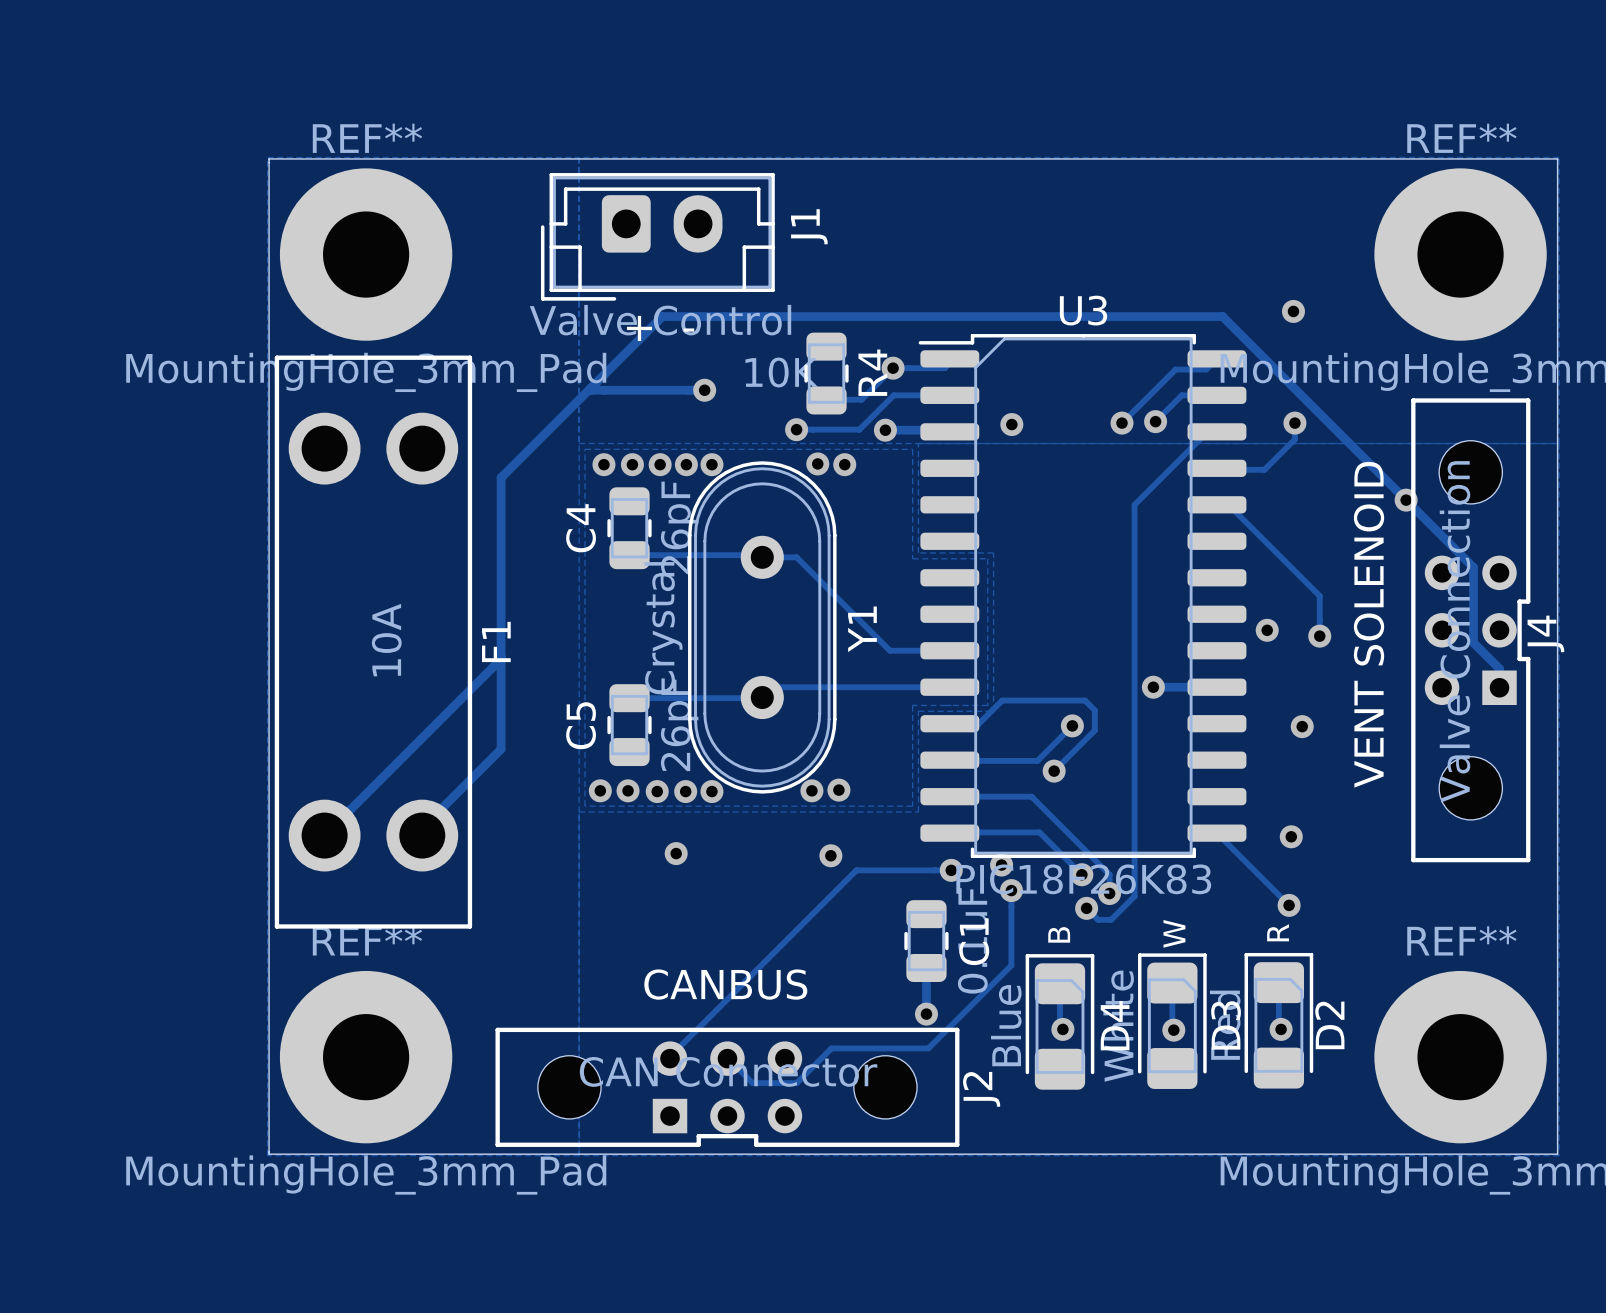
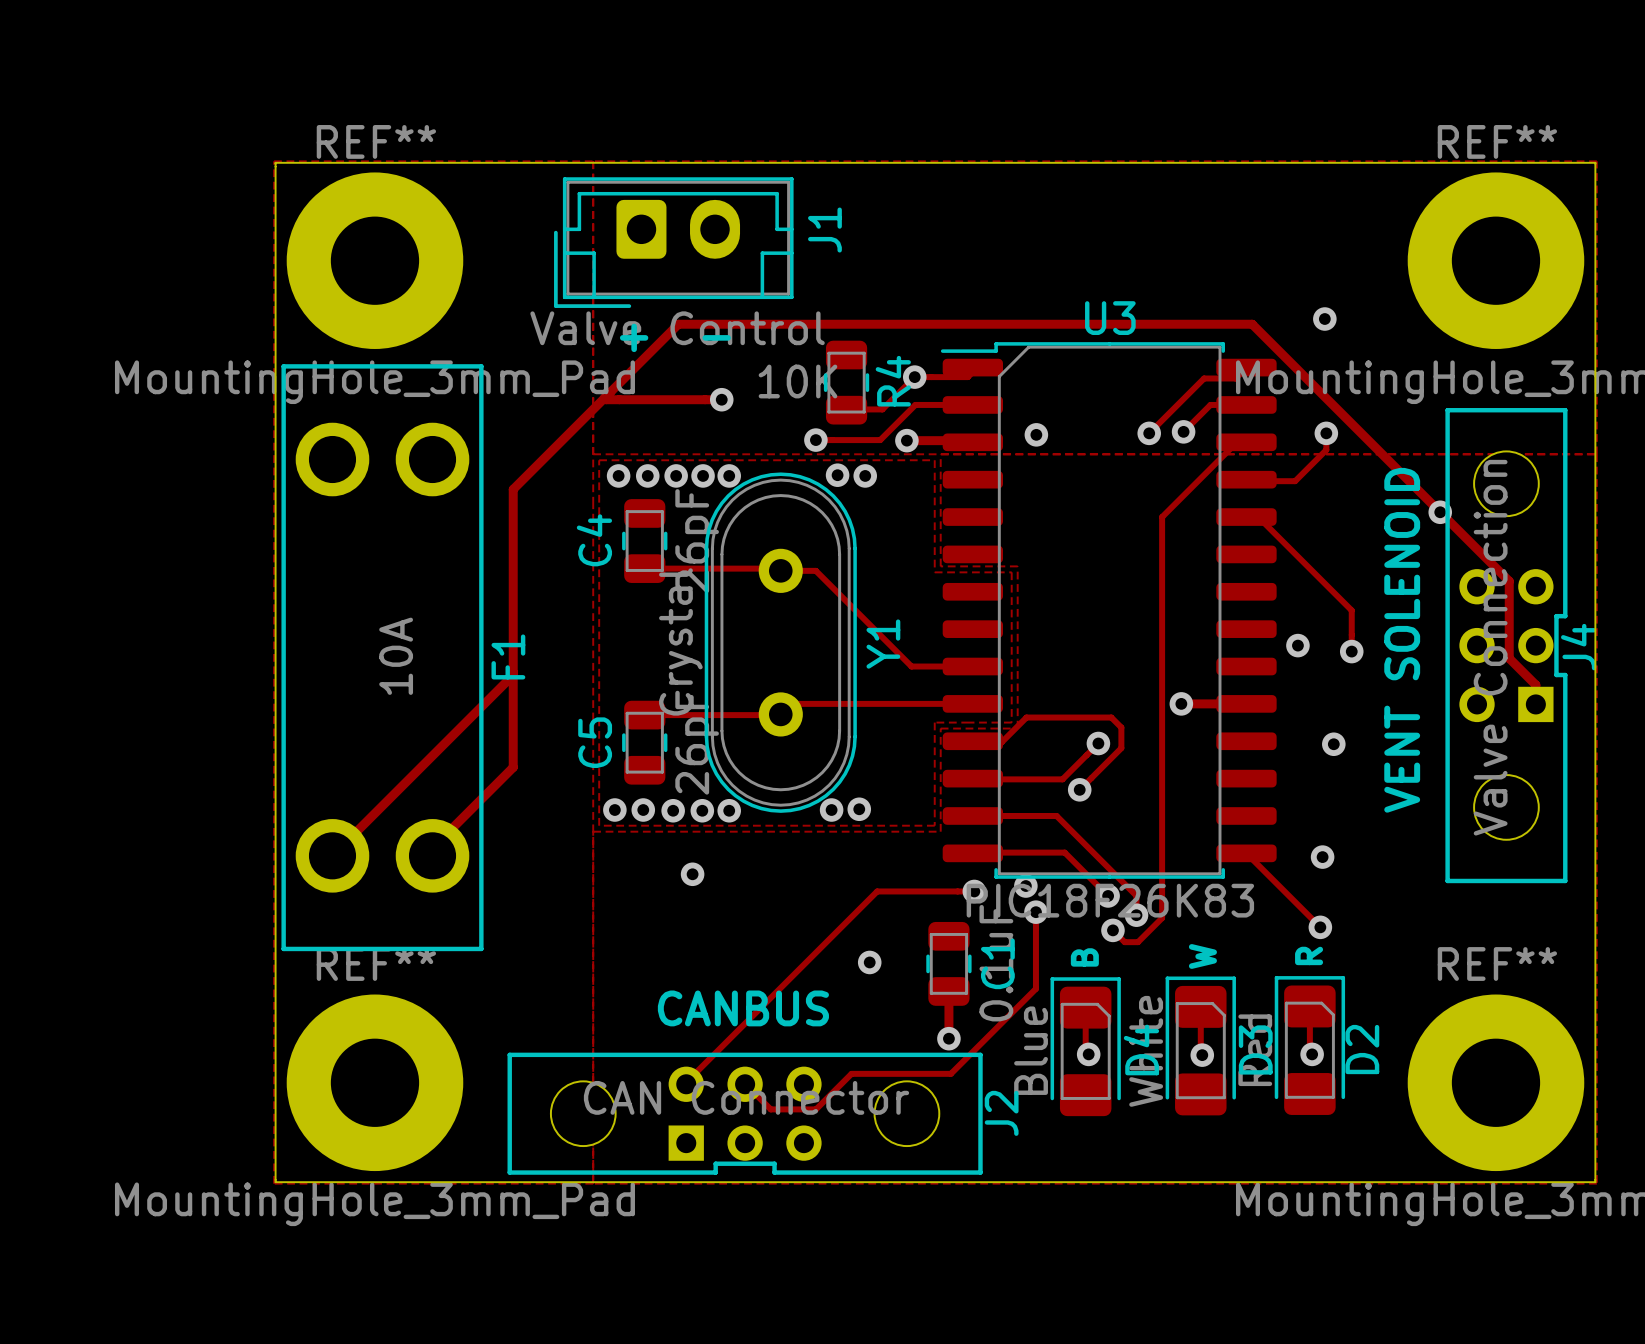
via position: (830, 855) -> (869, 962)

